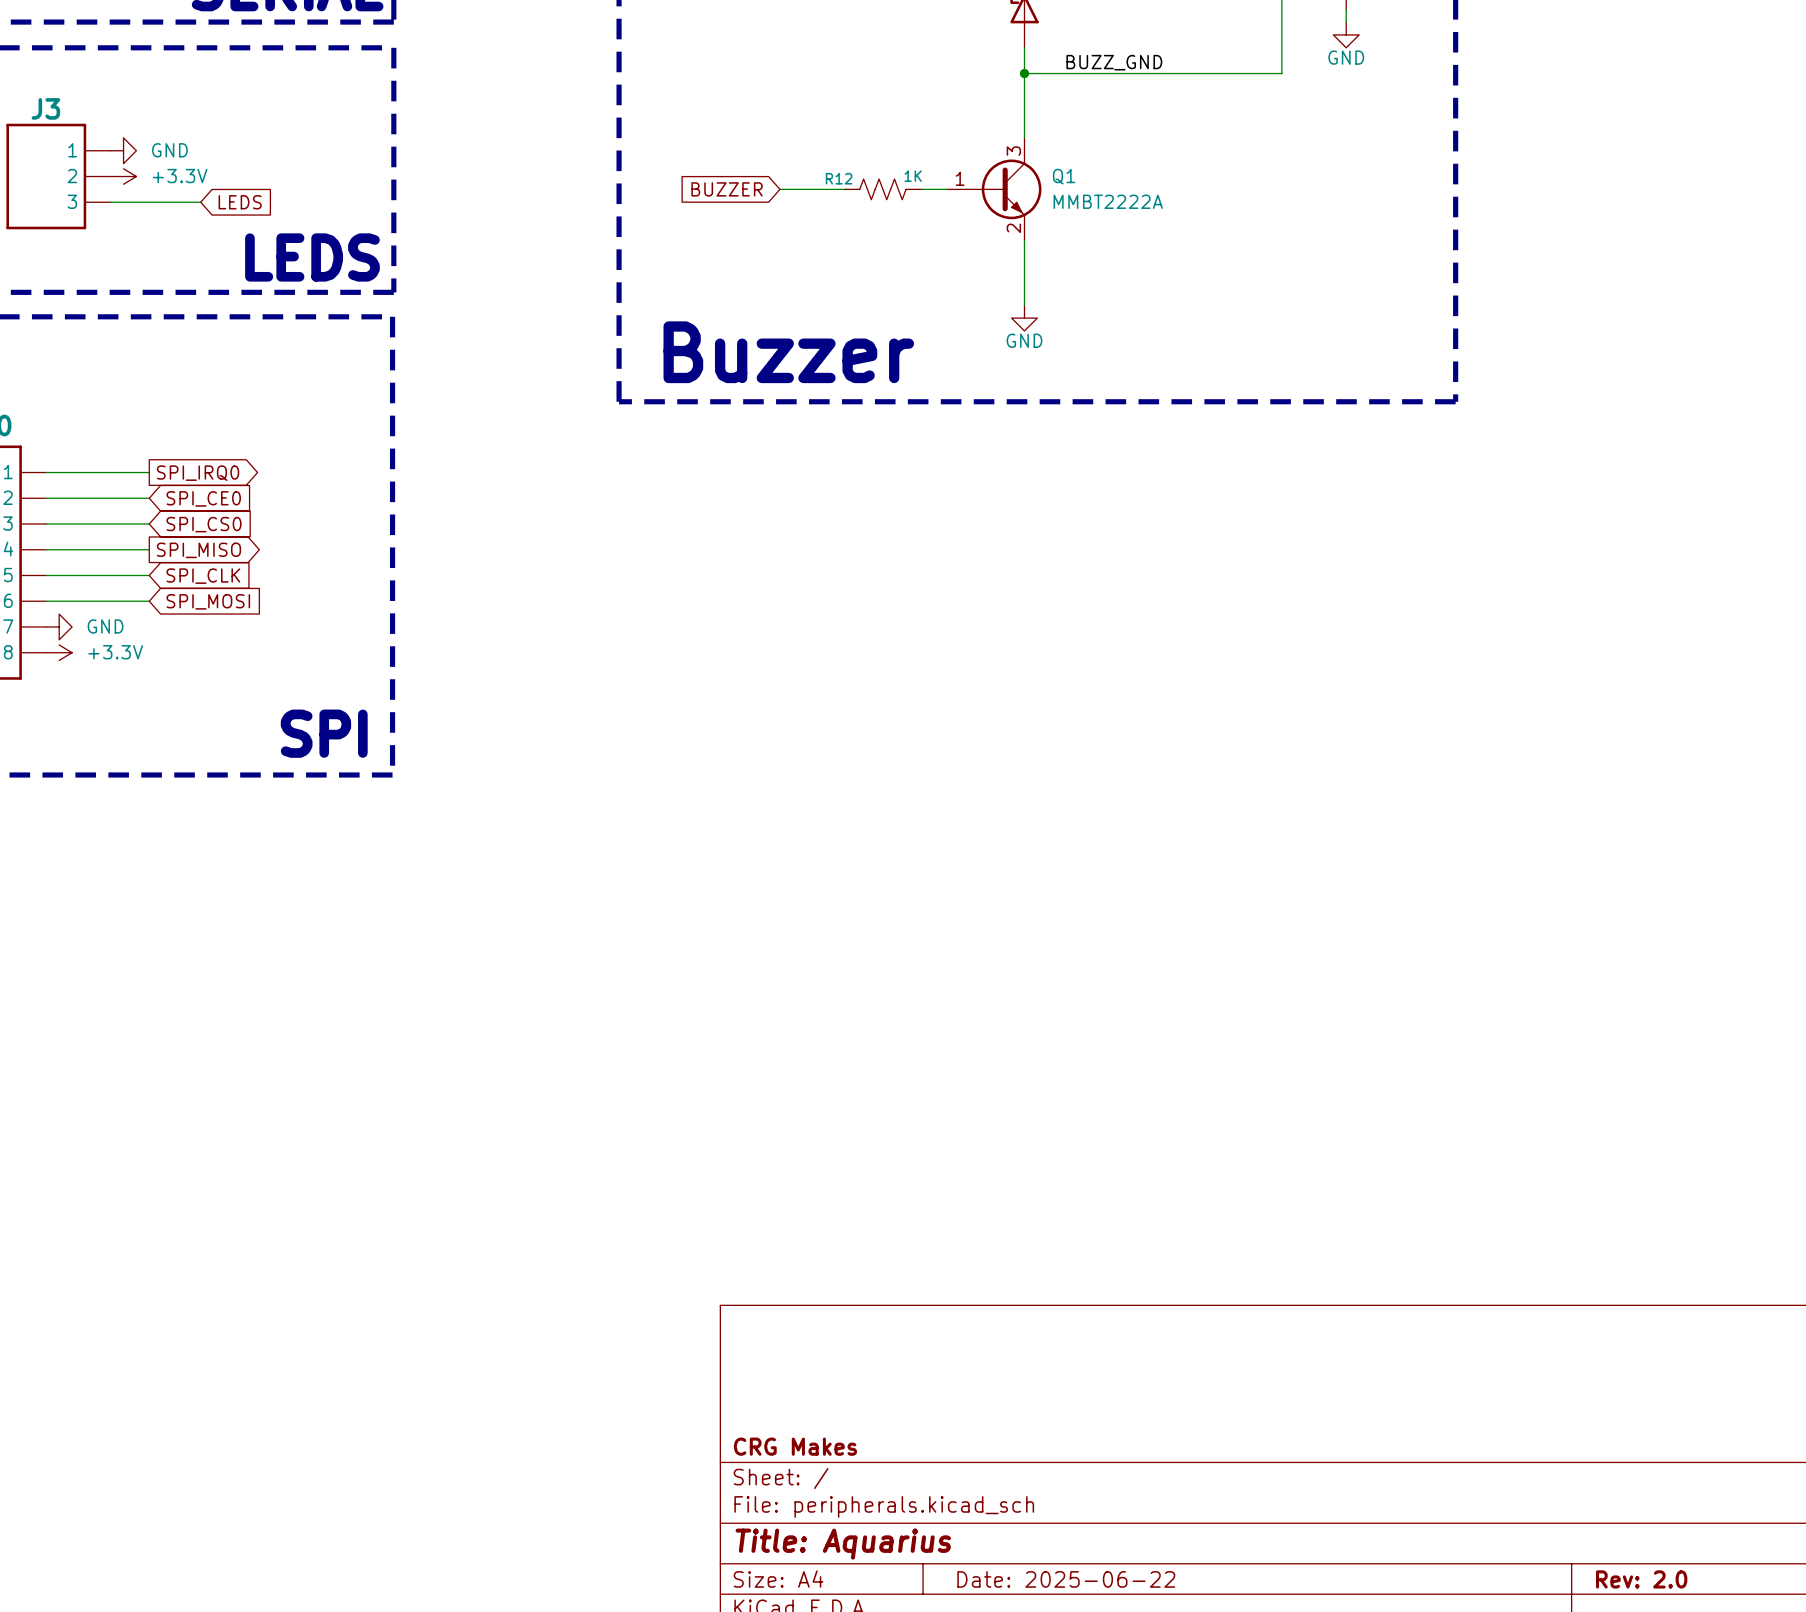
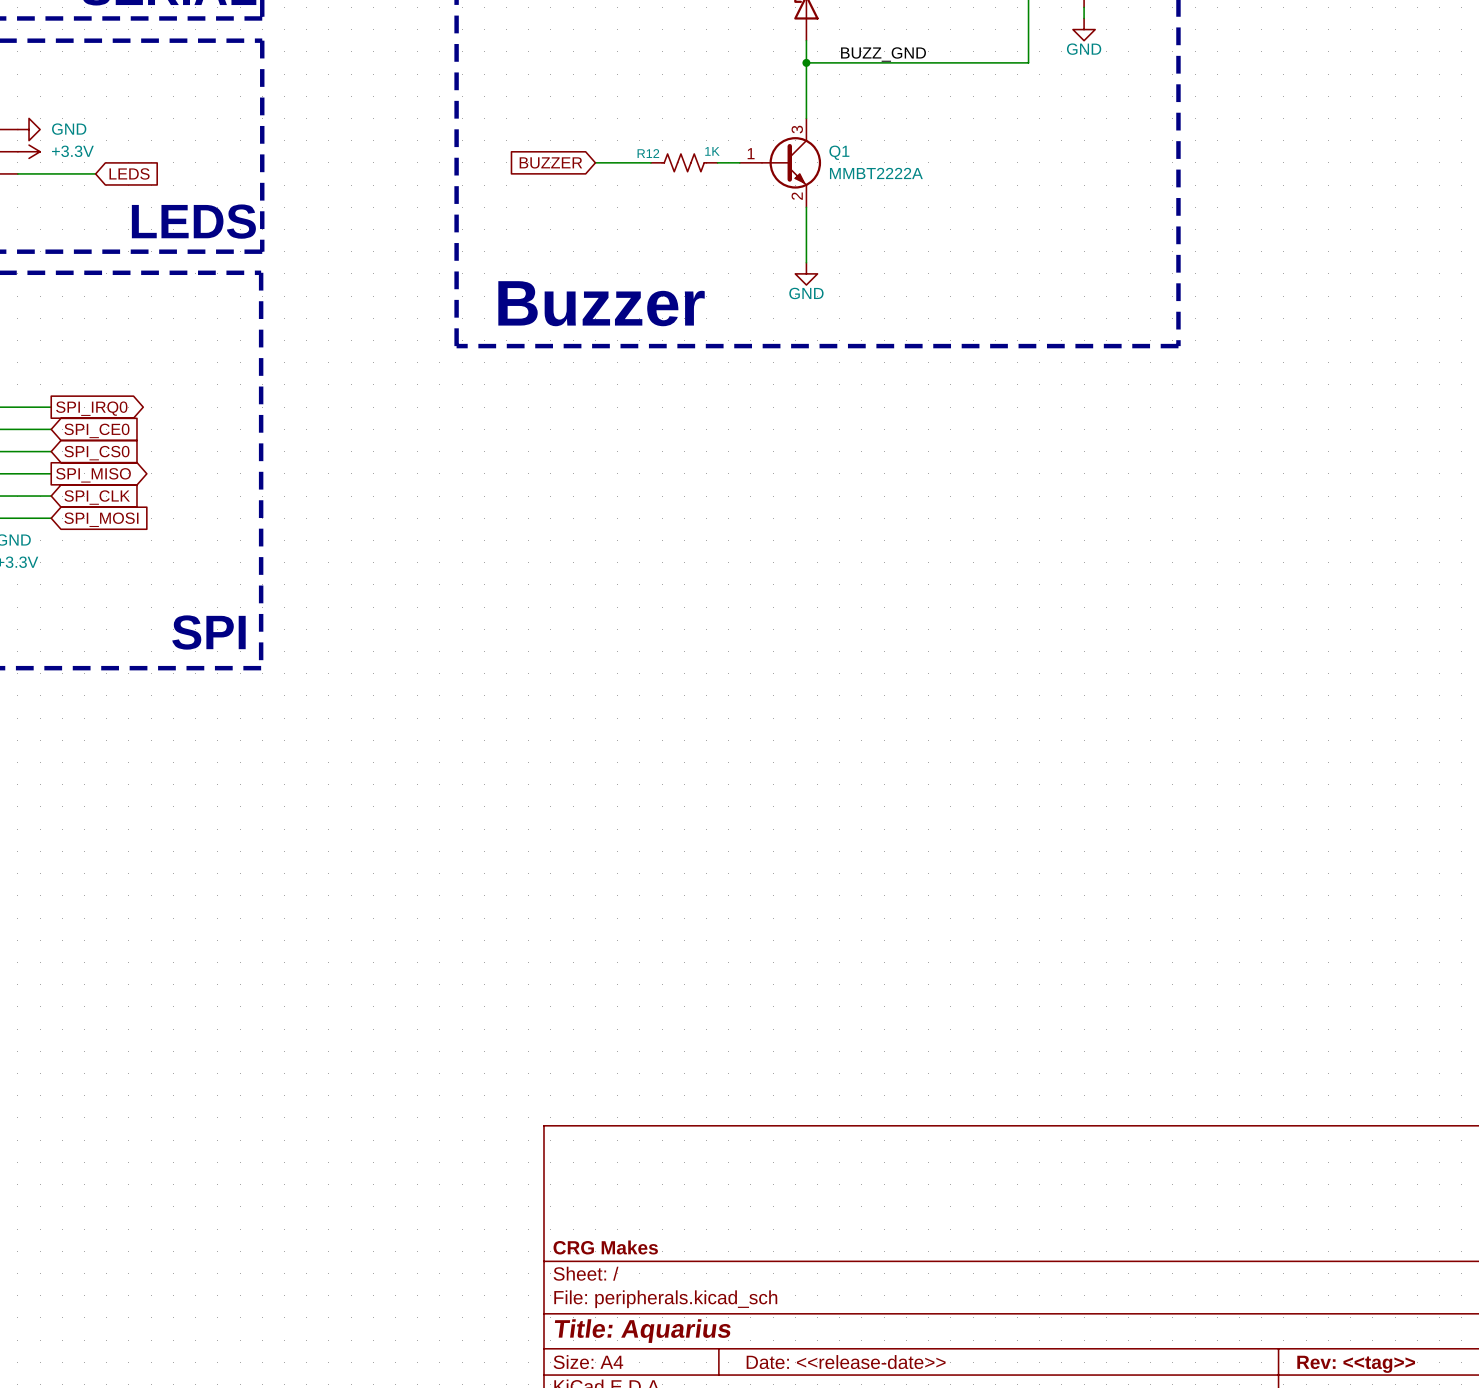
title block: Date: 2025-06-22 (1066, 1579) -> Date: <<release-date>> (846, 1362)
title block: Rev: 2.0 (1641, 1579) -> Rev: <<tag>> (1356, 1364)

